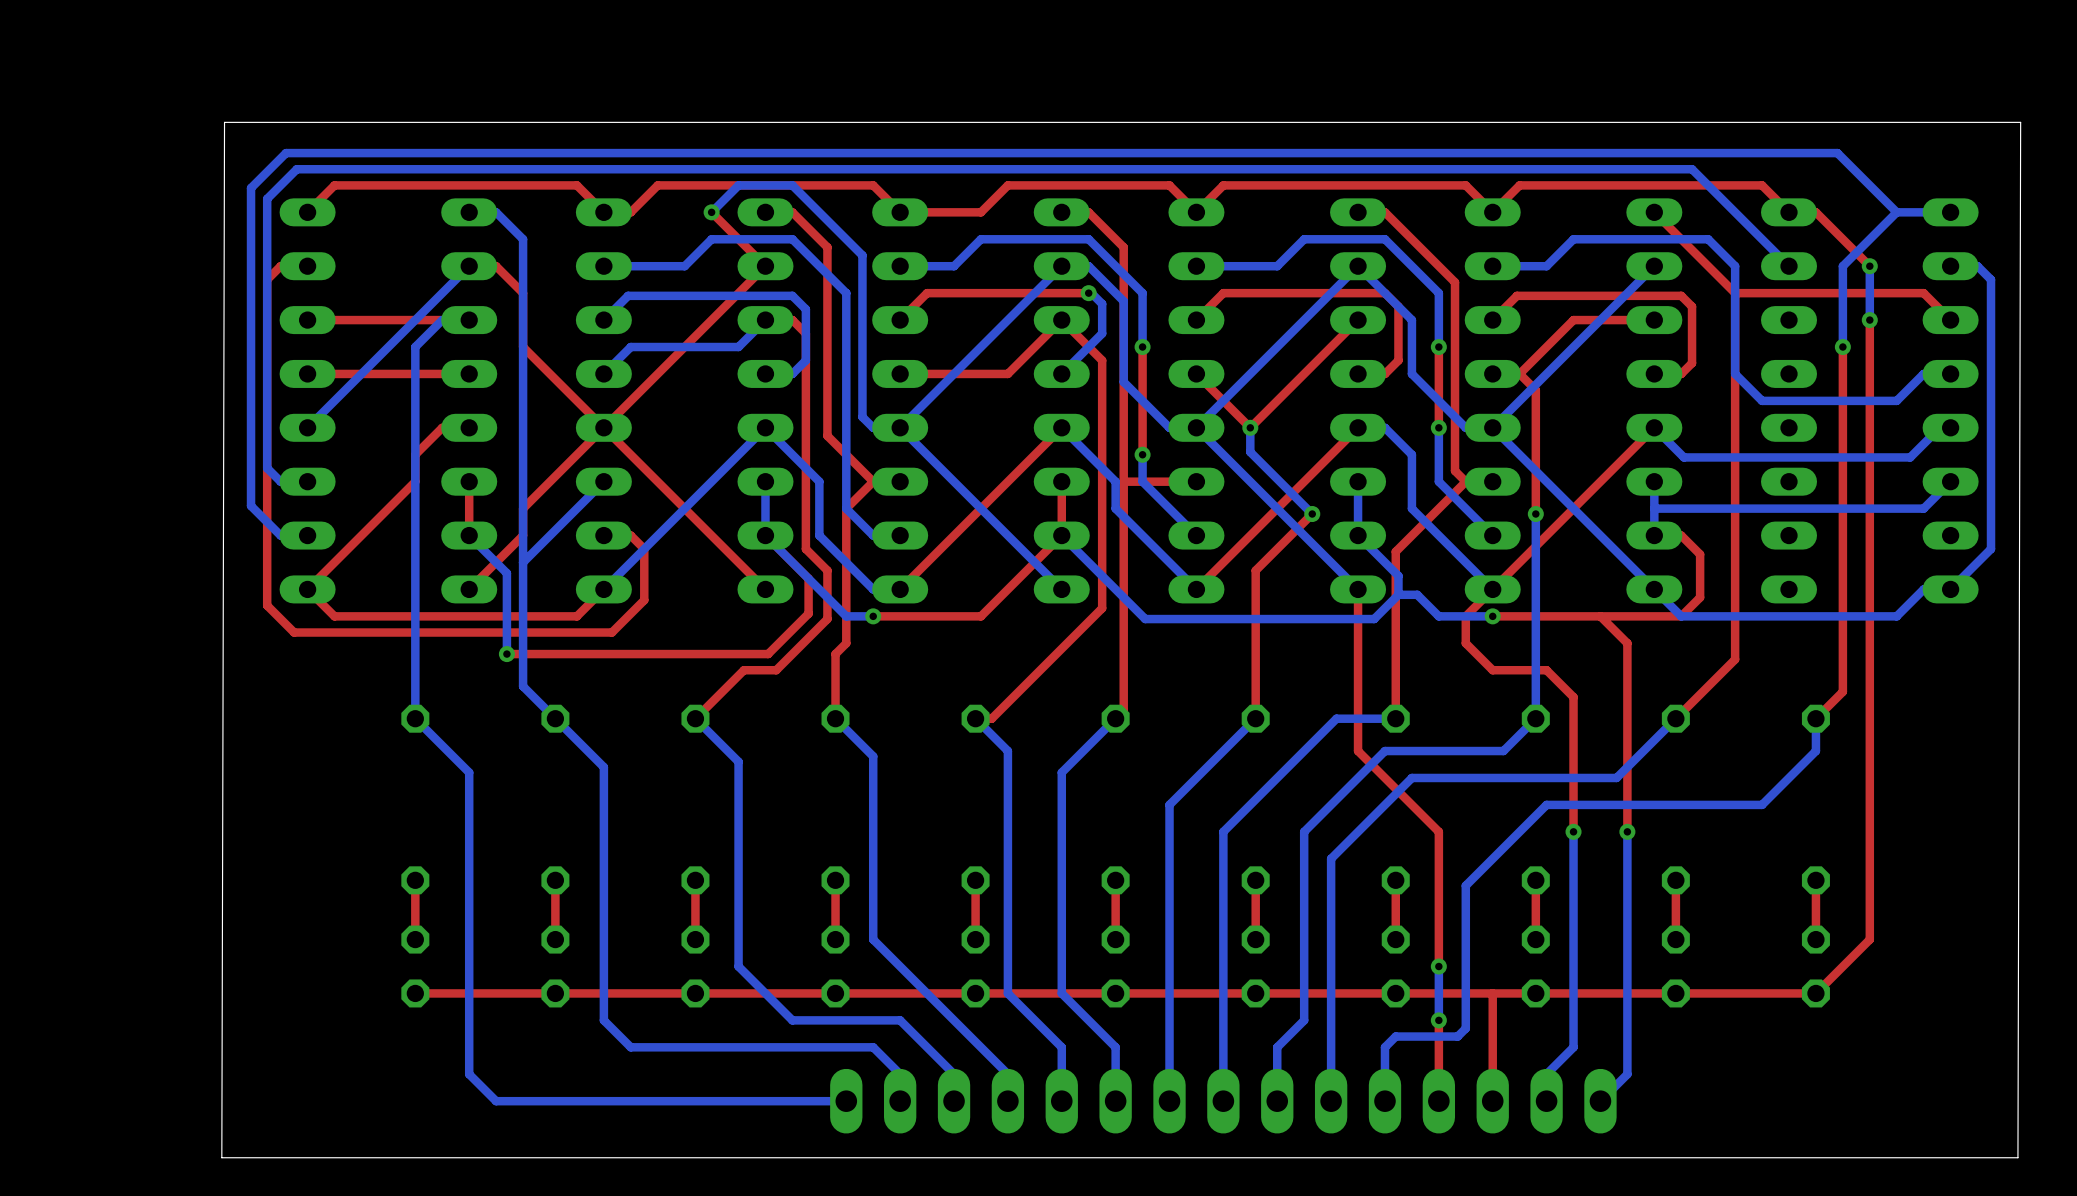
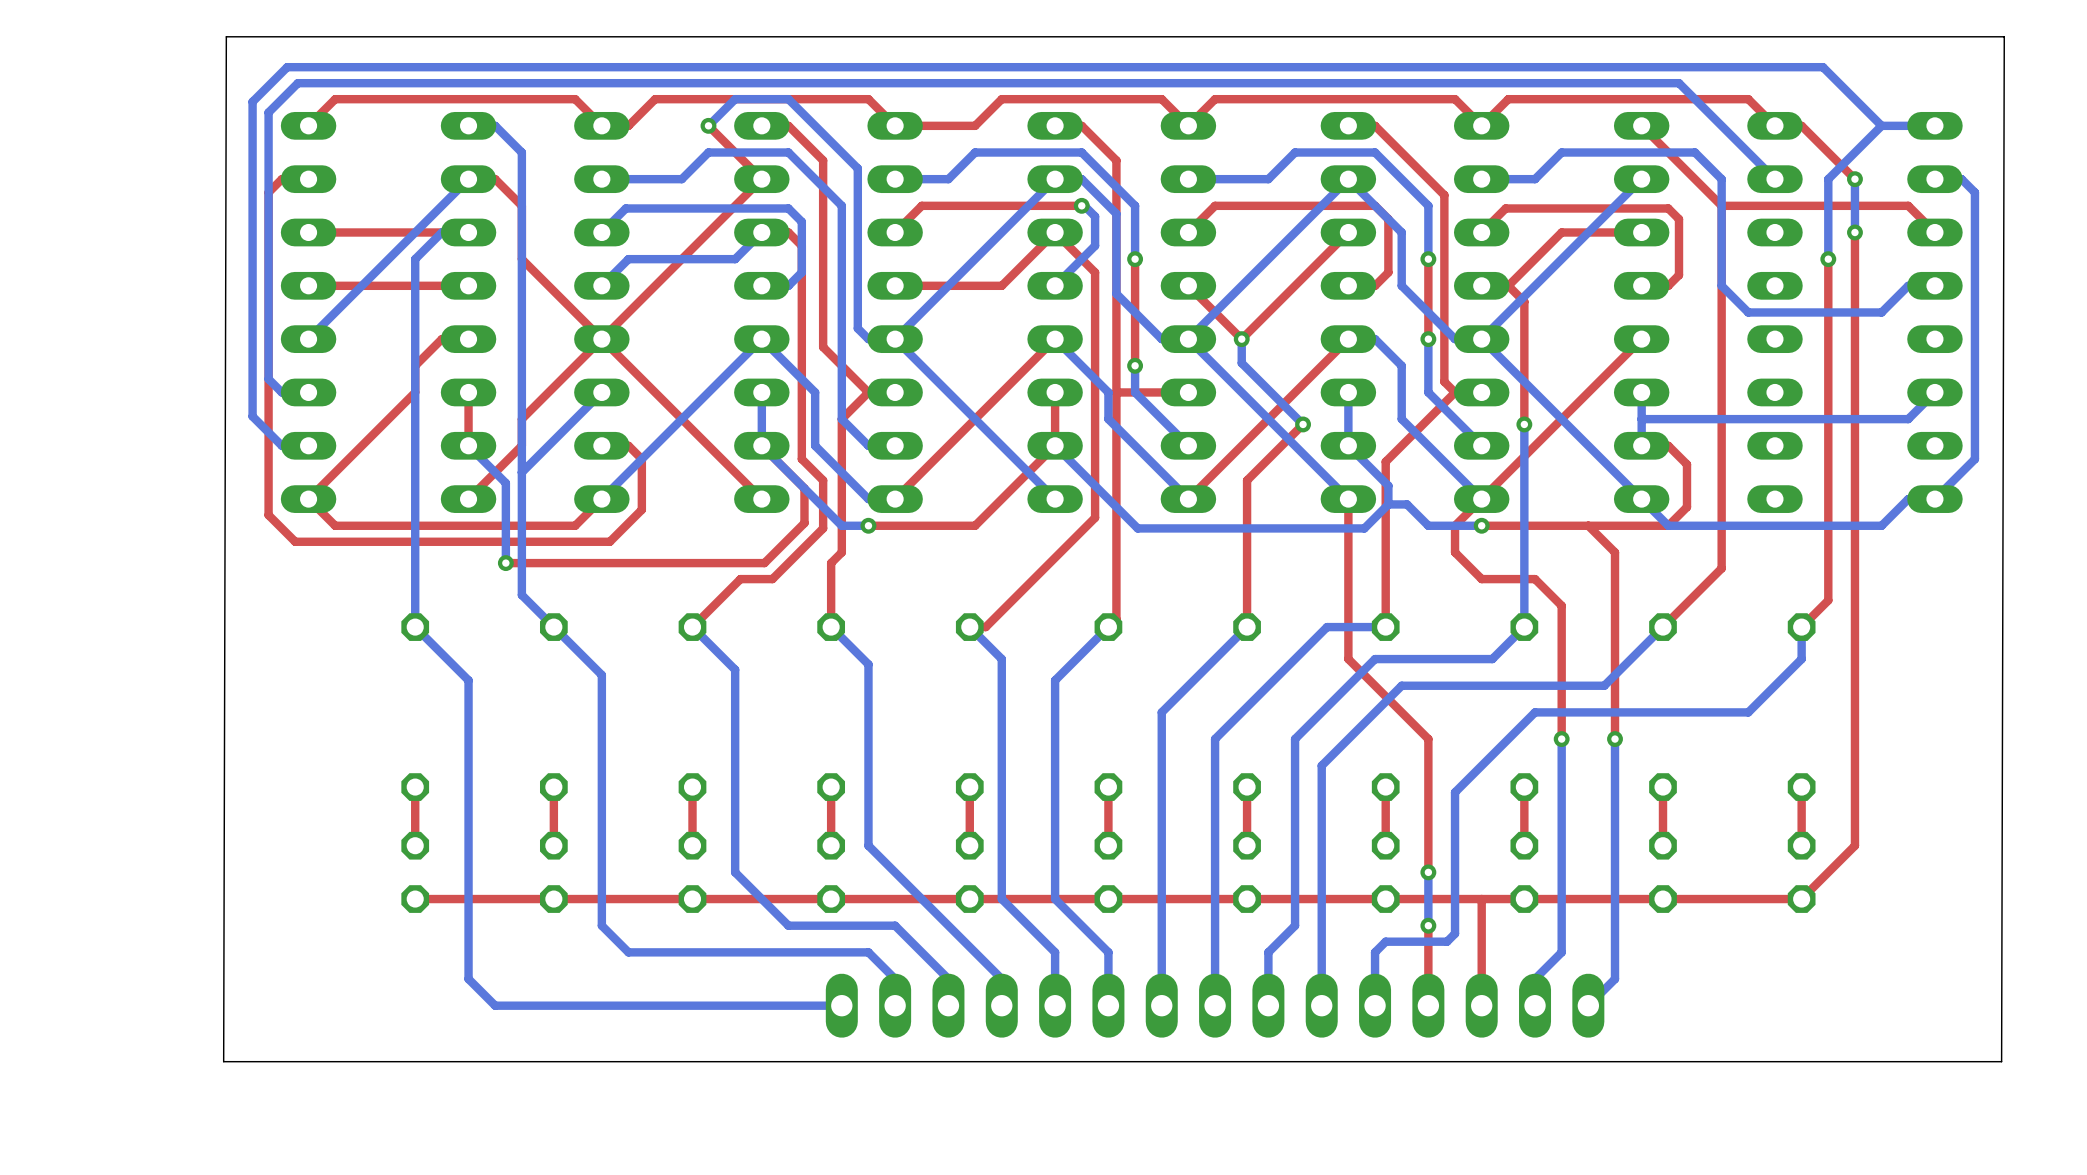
bottom track: (1950, 427) (1939, 427) (1910, 457) (1683, 457) (1654, 427) -> none

